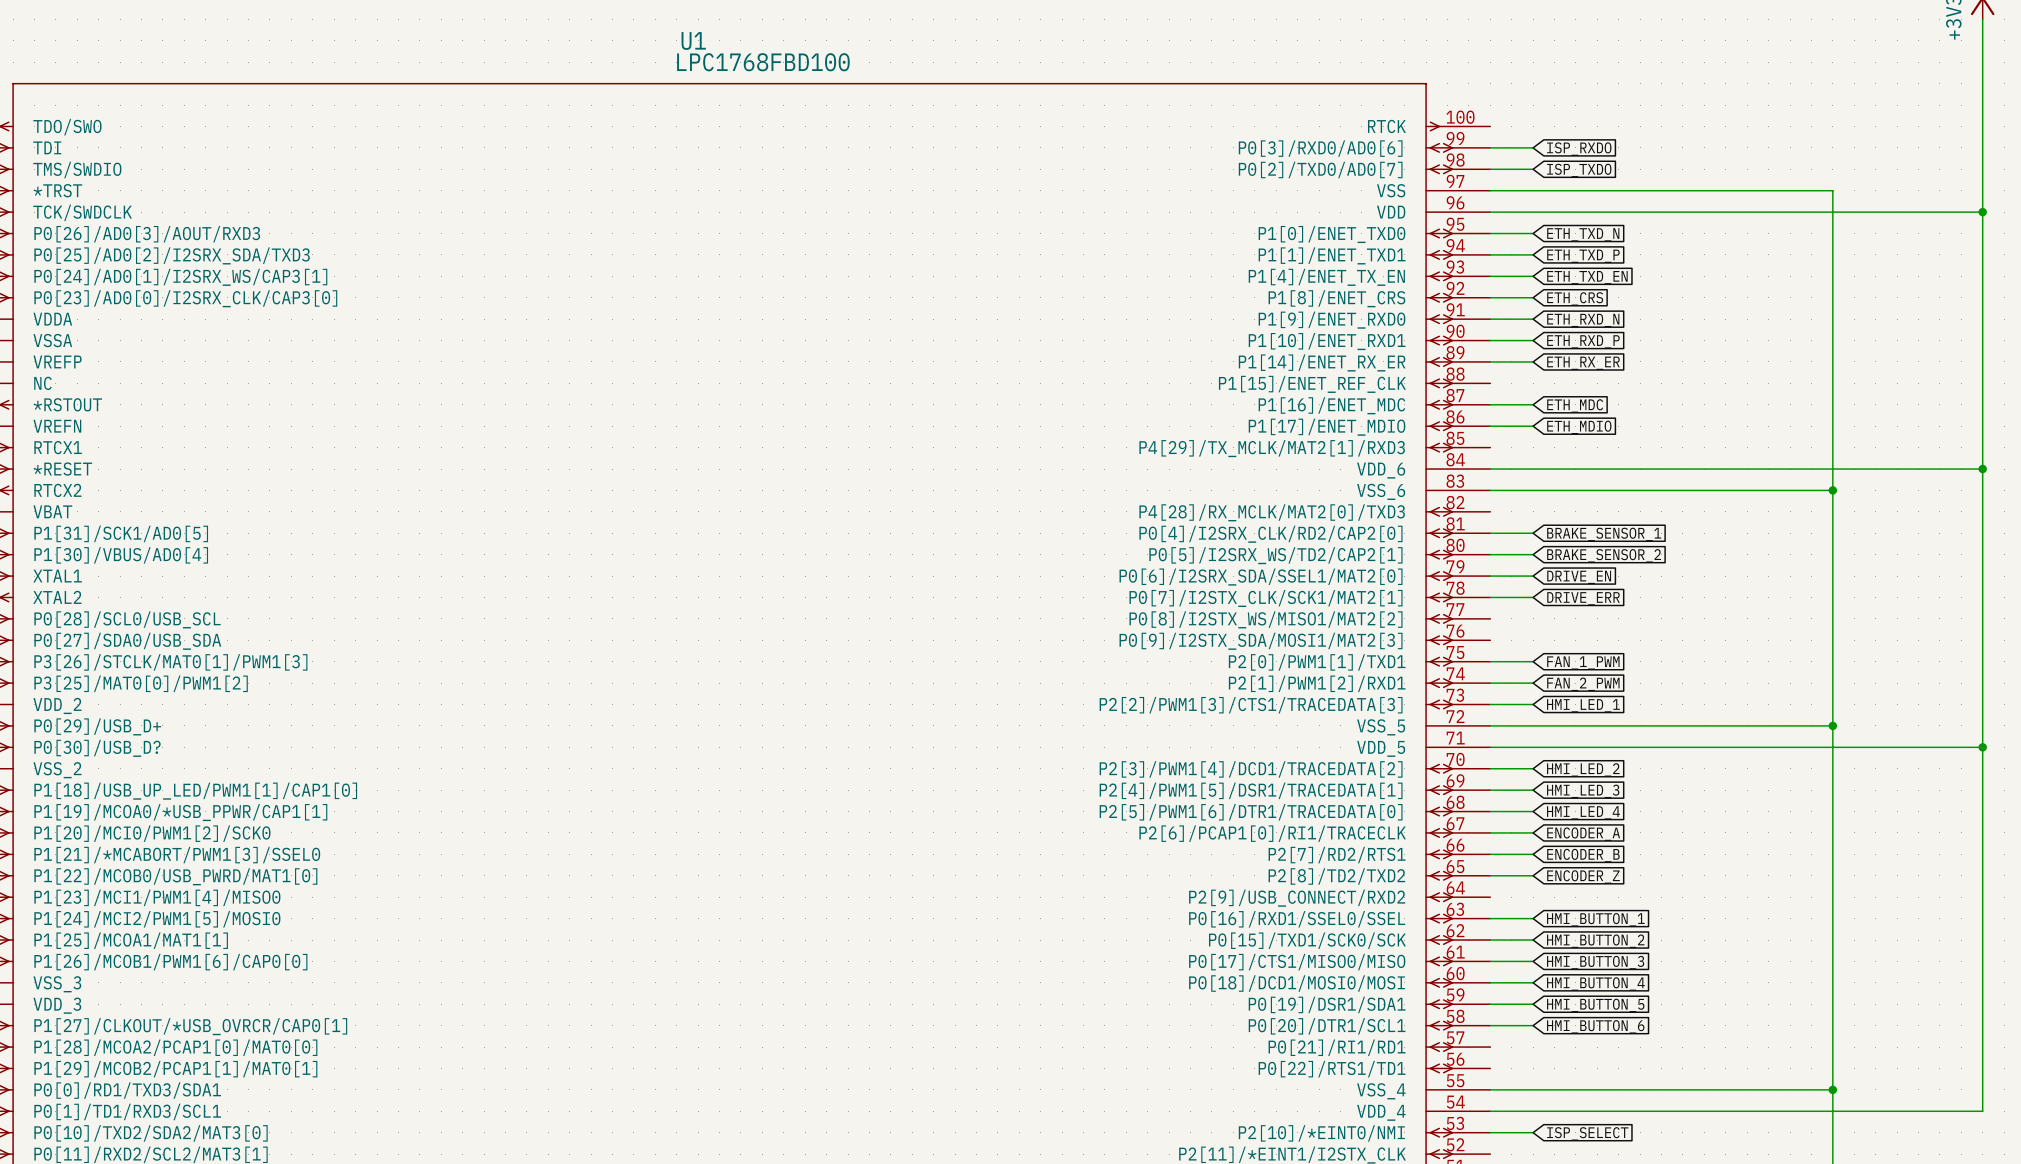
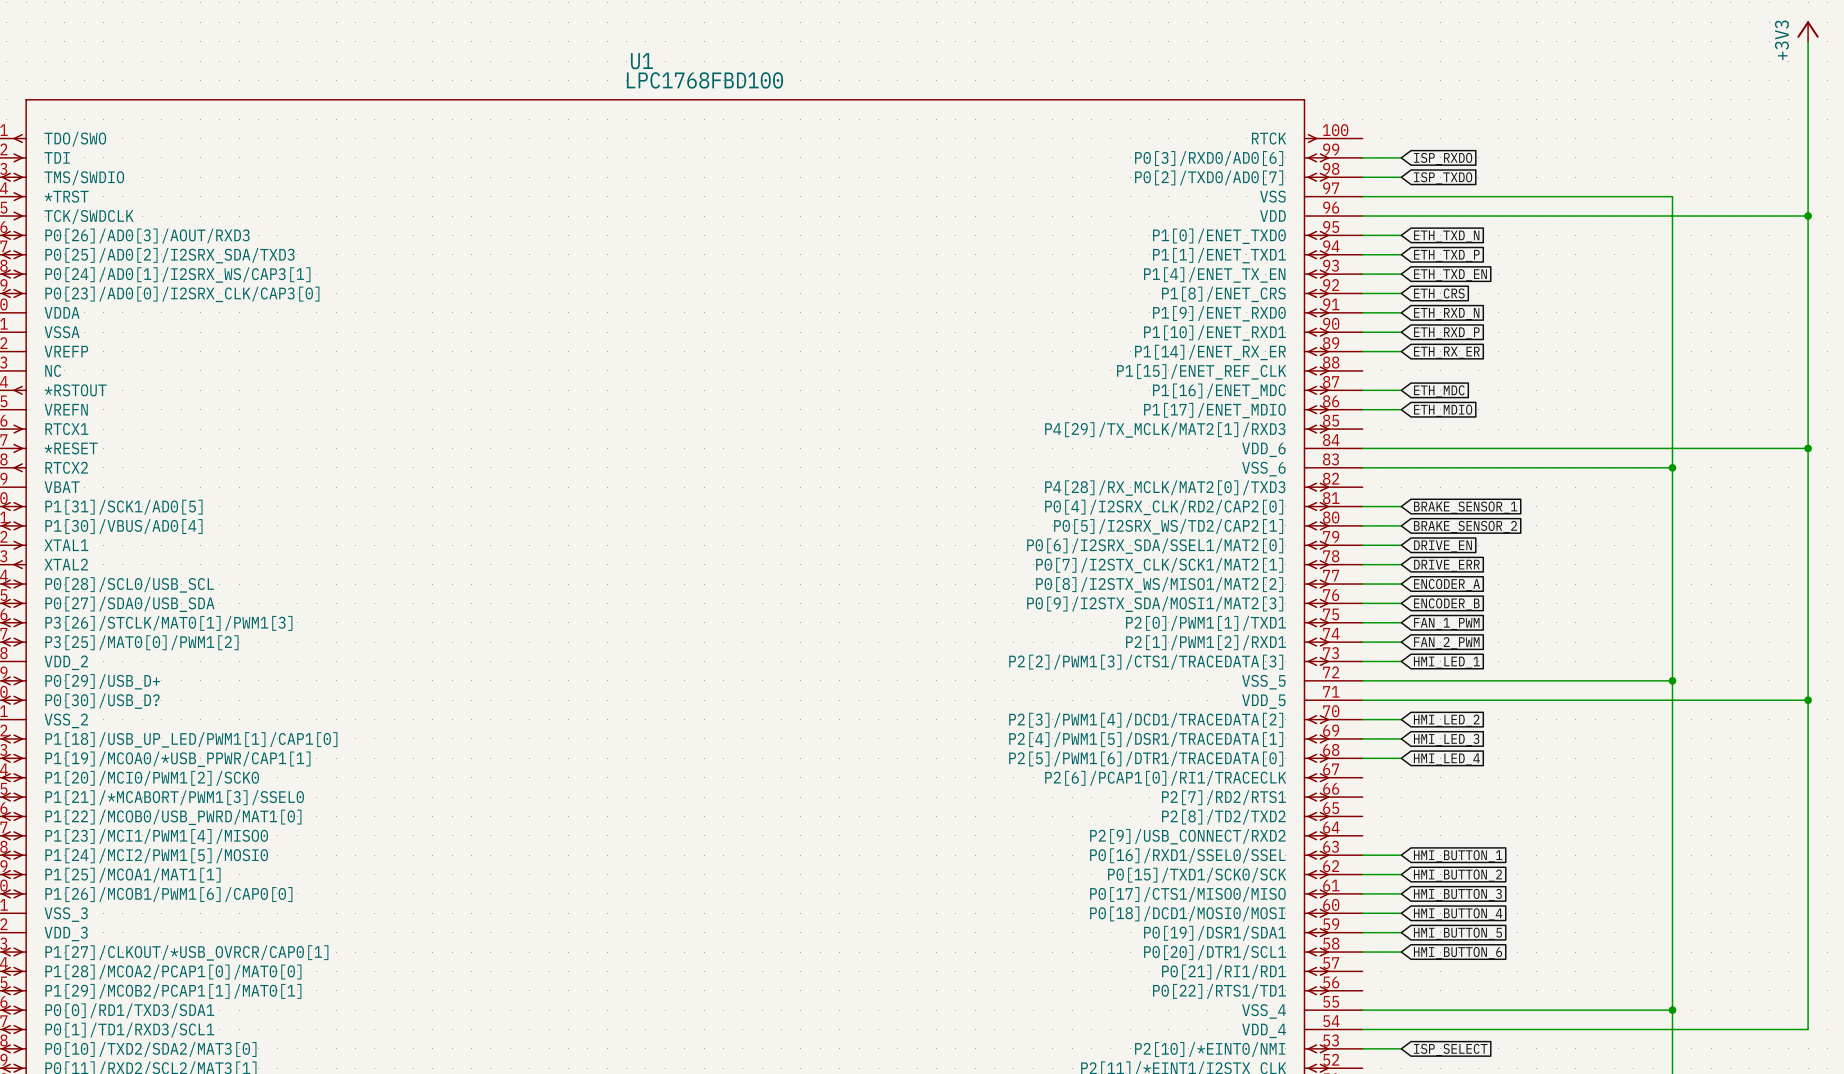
wire: none -> (1362, 584) (1401, 584)
global label: none -> ENCODER_A (1447, 585)
global label: none -> ENCODER_B (1446, 604)
wire: (1490, 832) (1533, 832) -> (1362, 603) (1401, 603)
global label: ENCODER_A (1583, 834) -> none
wire: (1490, 854) (1533, 854) -> none
global label: ENCODER_B (1583, 855) -> none
wire: (1490, 875) (1533, 875) -> none
global label: ENCODER_Z (1583, 876) -> none

